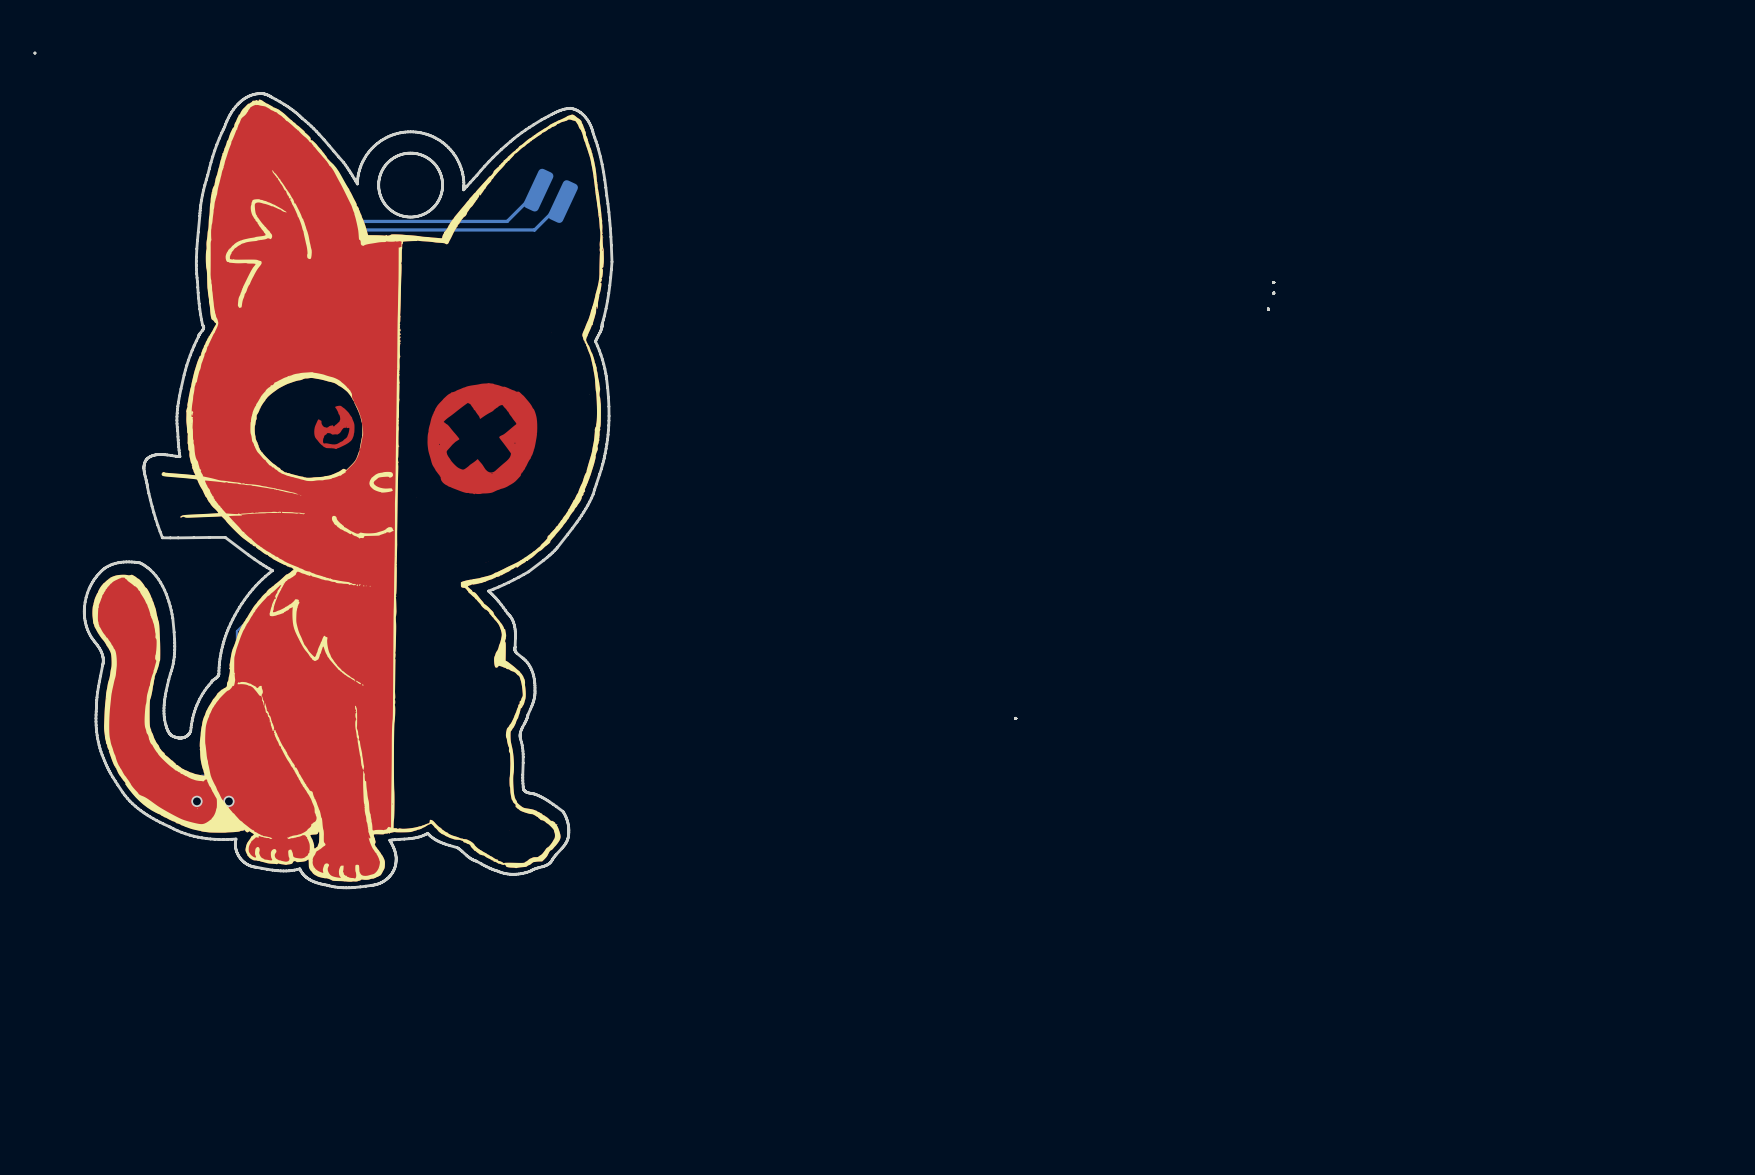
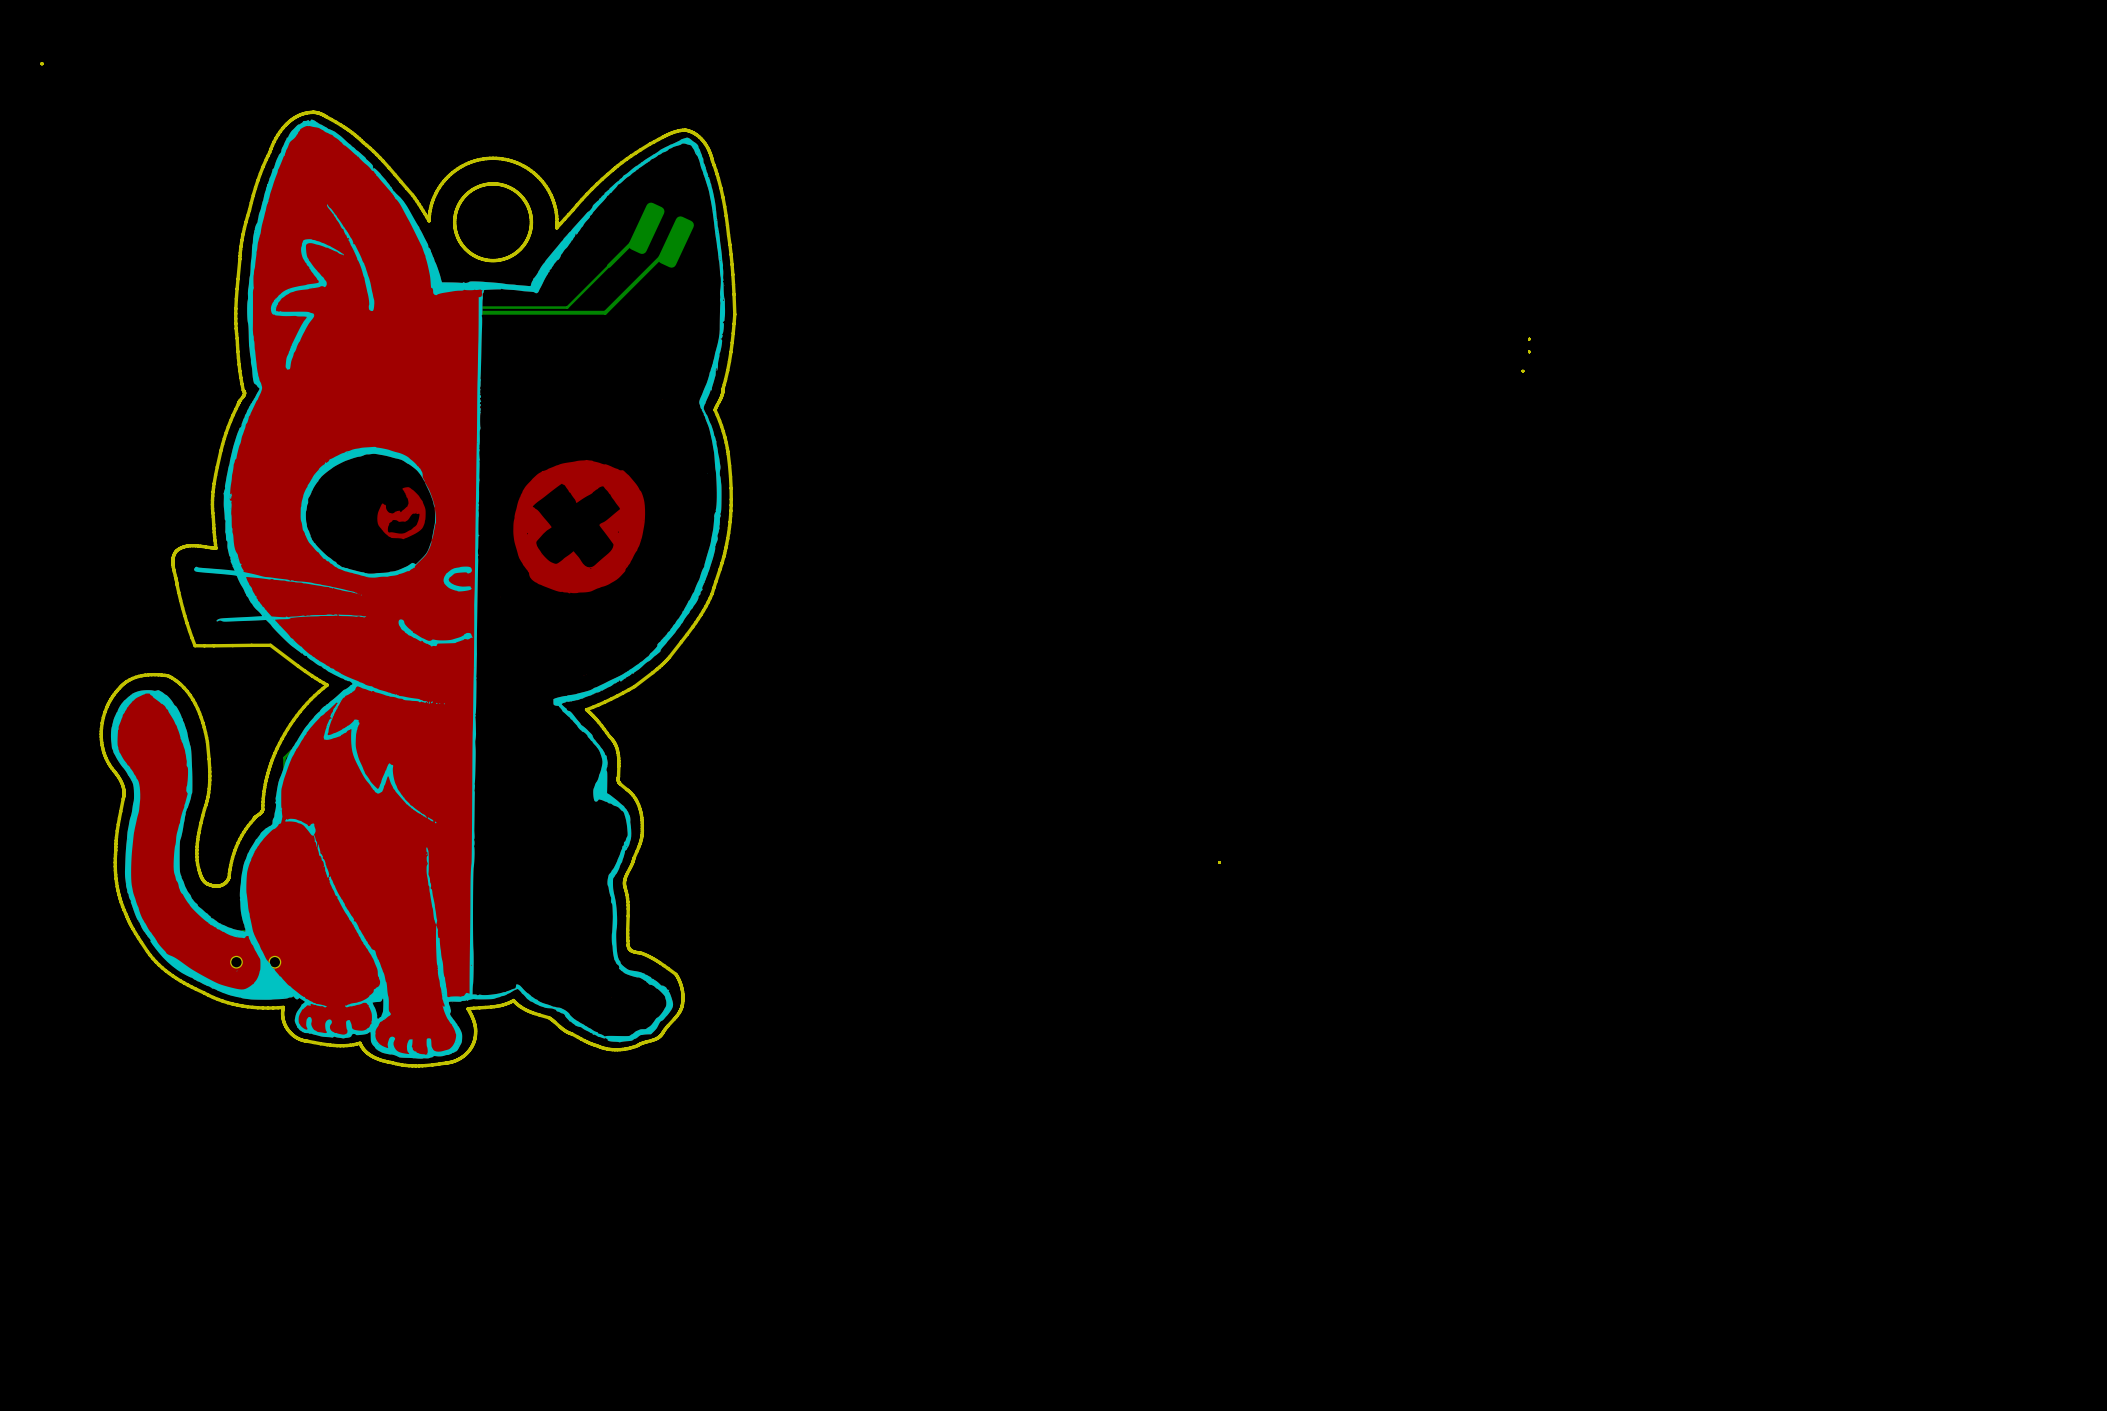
bottom track: (507, 221) (361, 221) (302, 280) (302, 308) -> (608, 265) (567, 307) (425, 307) (362, 370)
bottom track: (534, 229) (361, 229) (329, 261) (329, 329) -> (641, 276) (605, 312) (477, 312) (395, 395)

